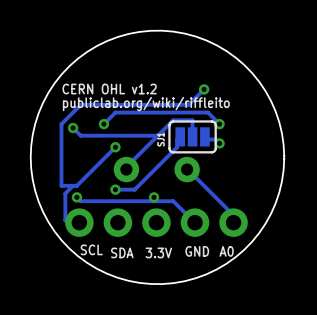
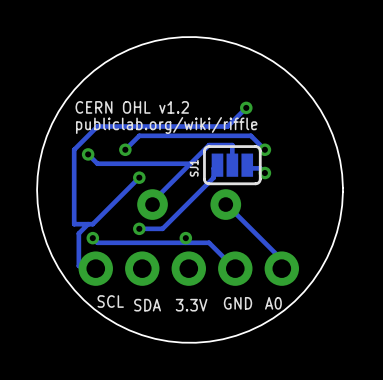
text: publiclab.org/wiki/riffleito (146, 104) -> publiclab.org/wiki/riffle (166, 125)

